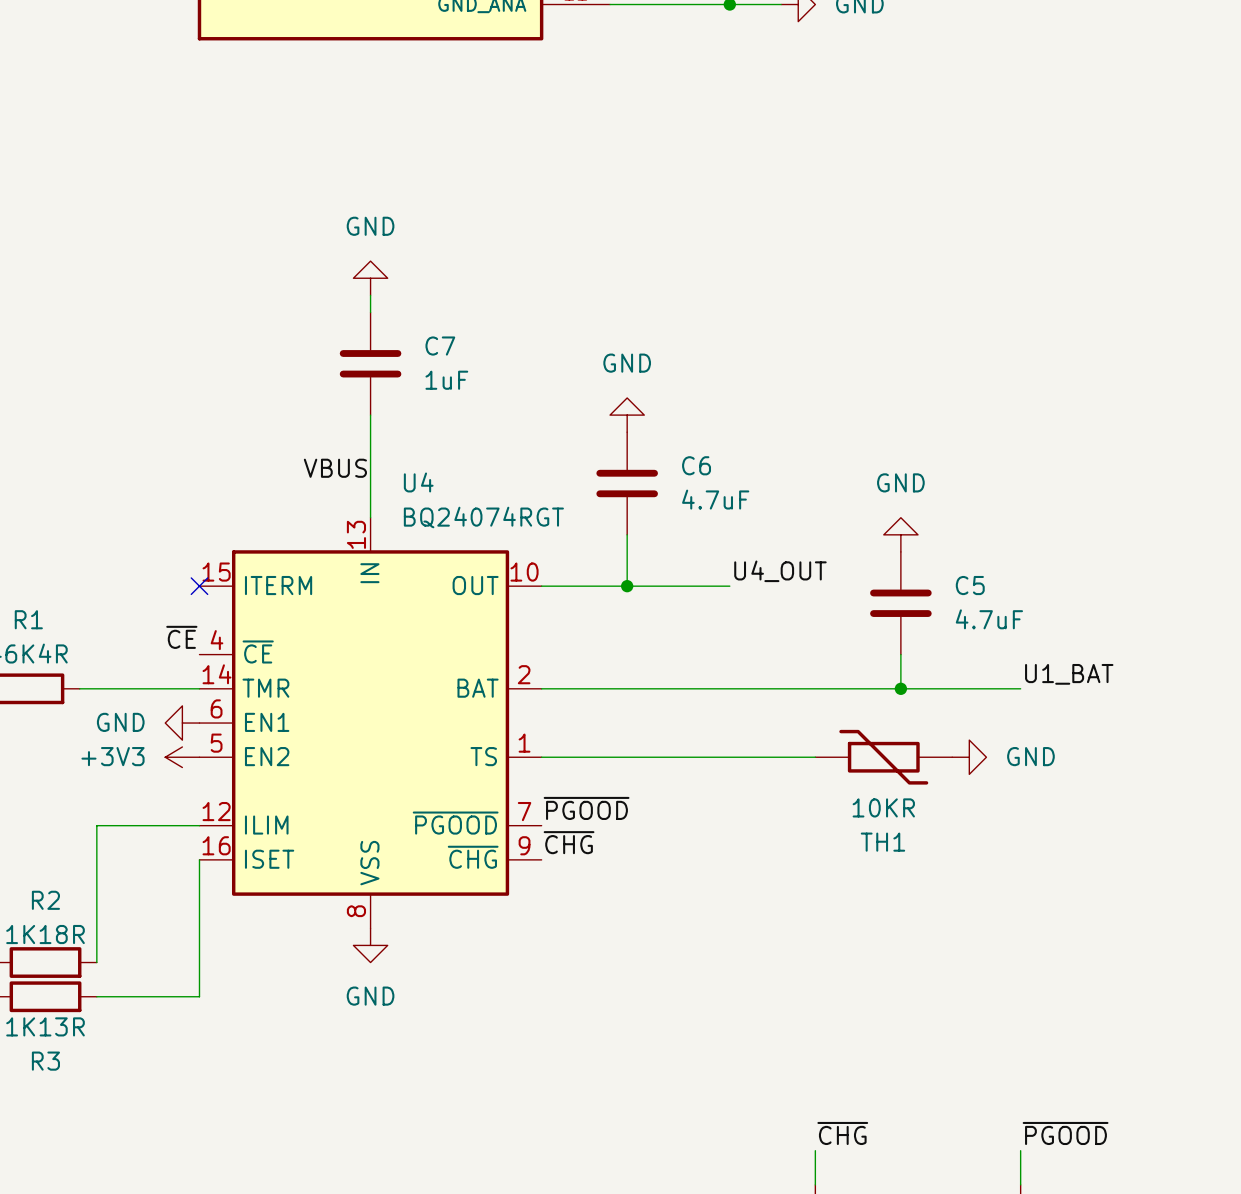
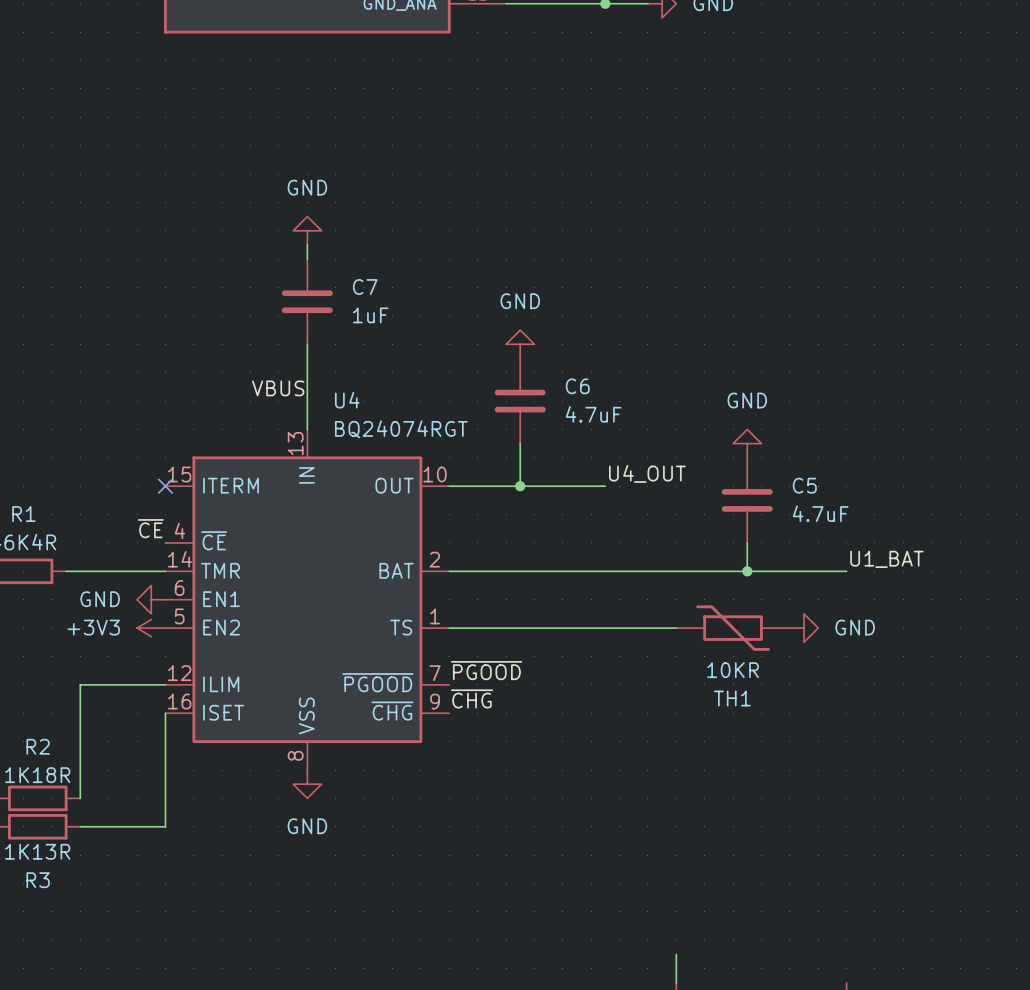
label: ~{CHG} (842, 1133) -> none
label: ~{PGOOD} (1065, 1133) -> none
wire: (1020, 1150) (1020, 1184) -> none

